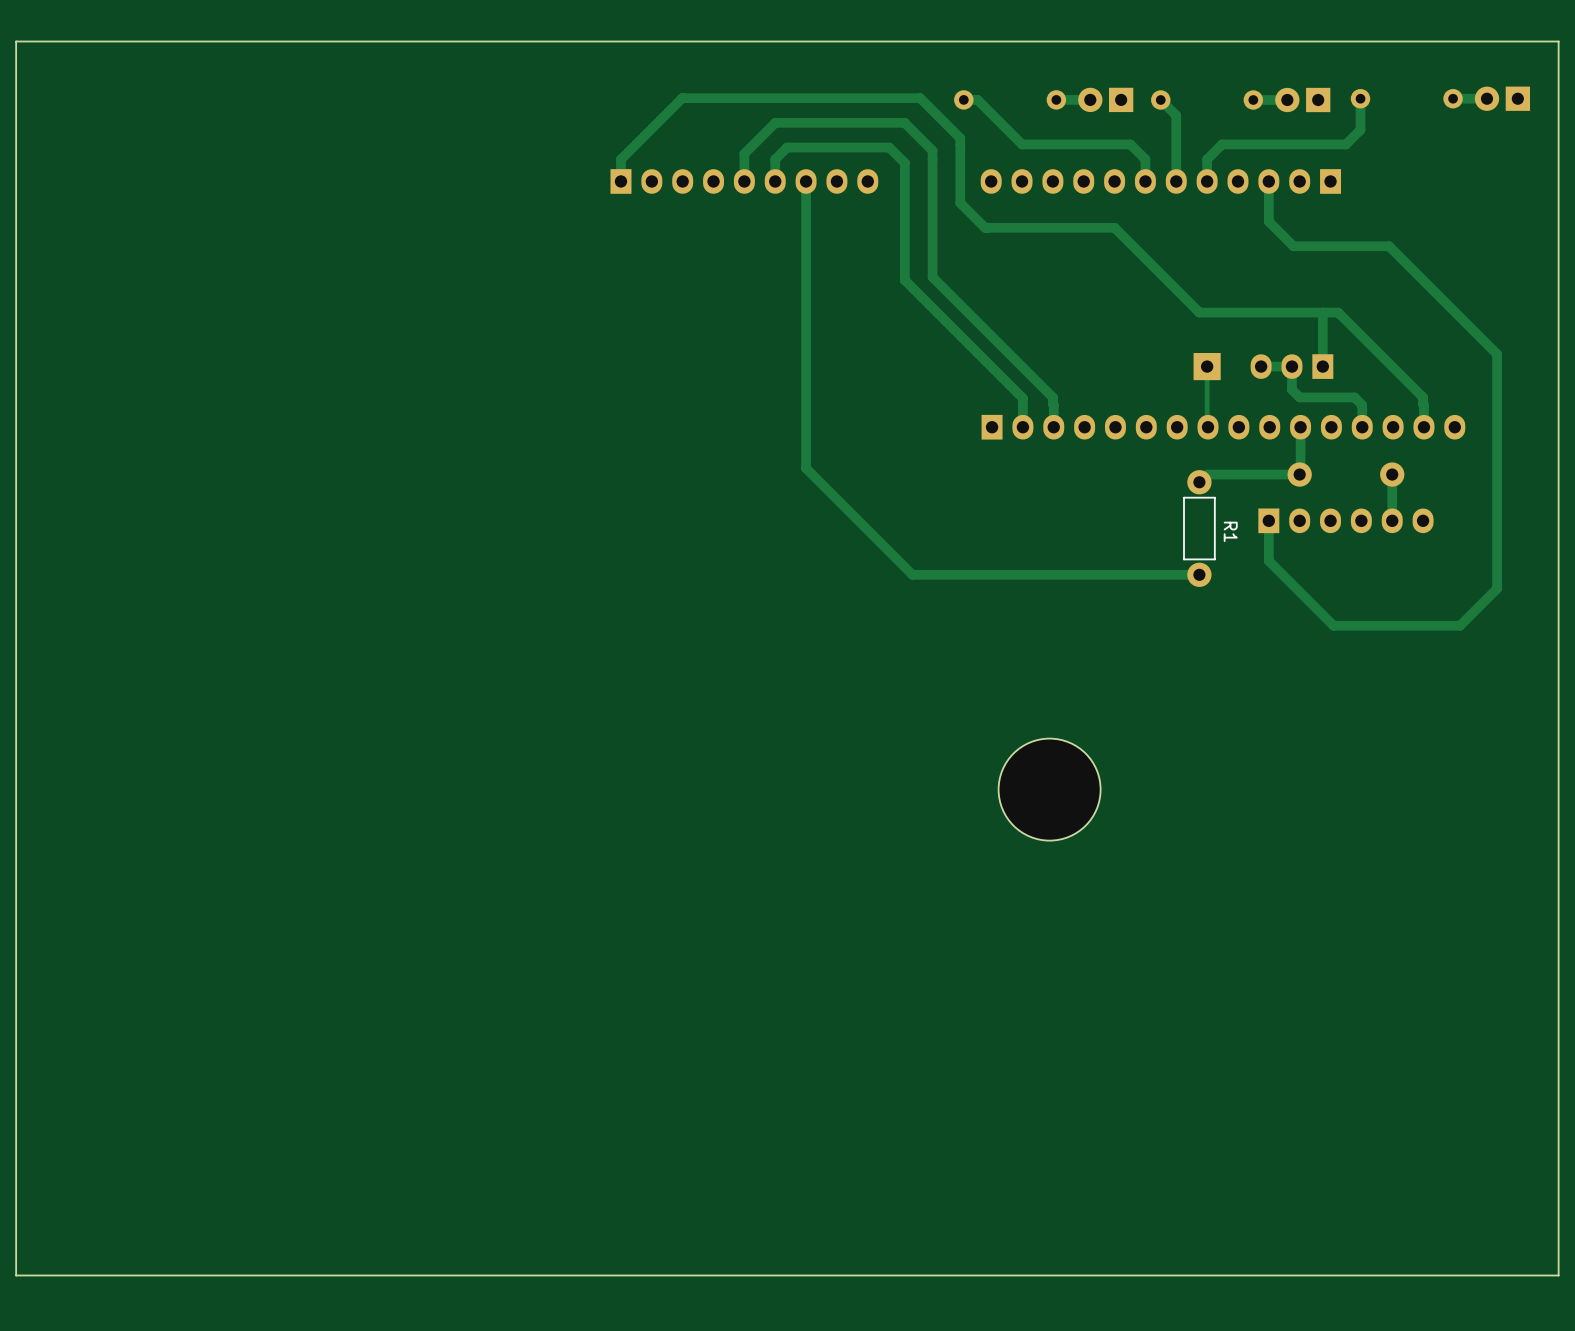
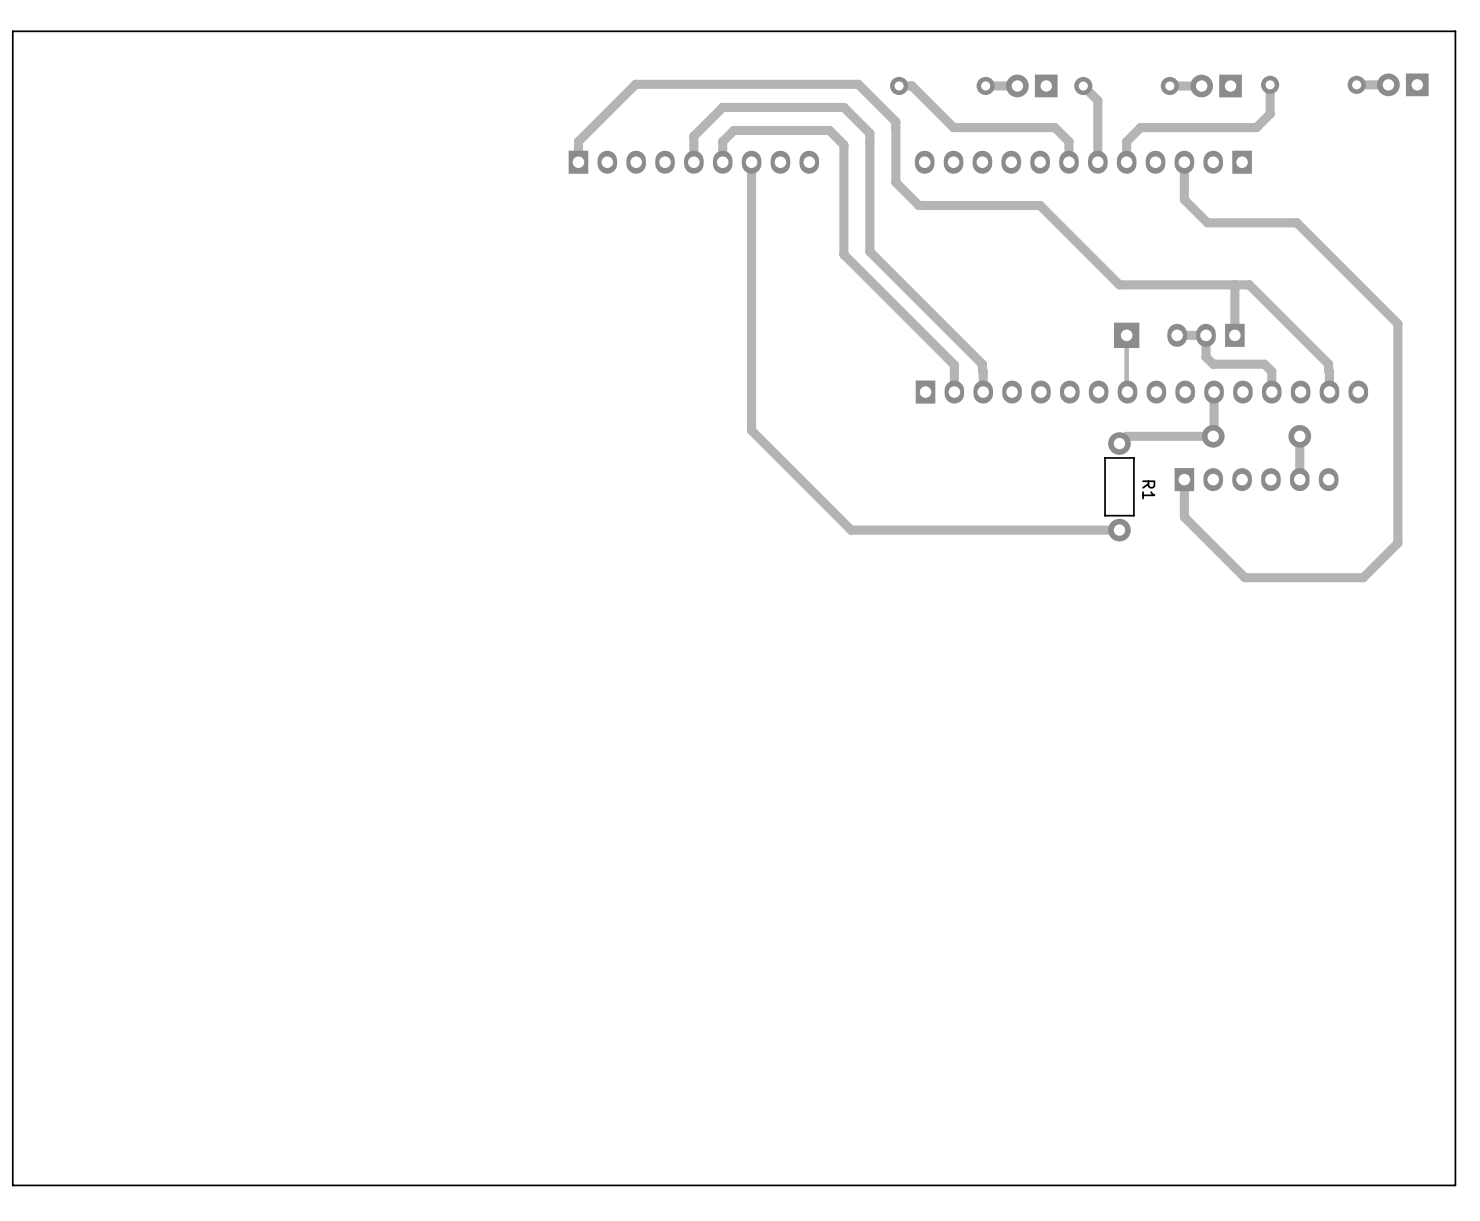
part: (1049, 789) -> none

